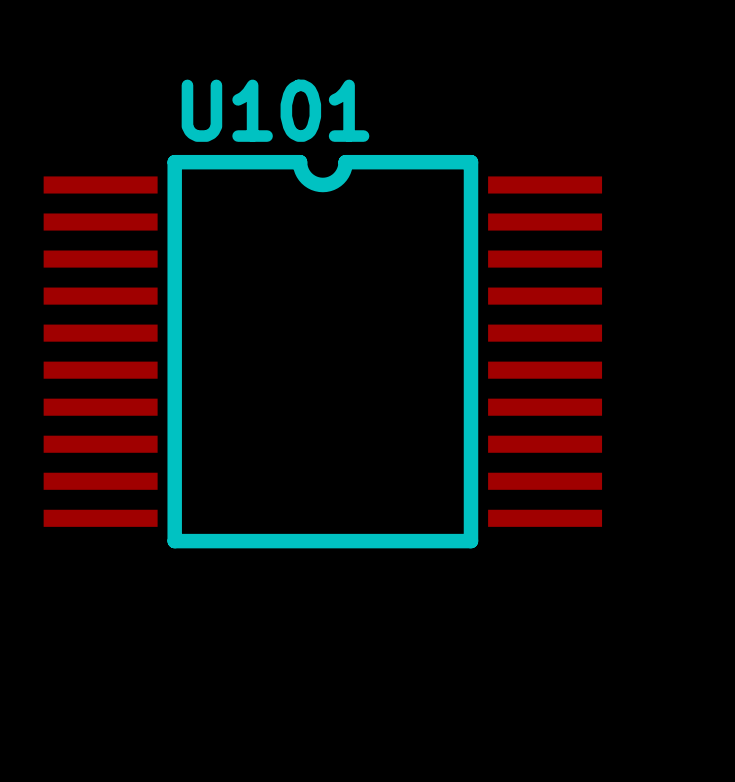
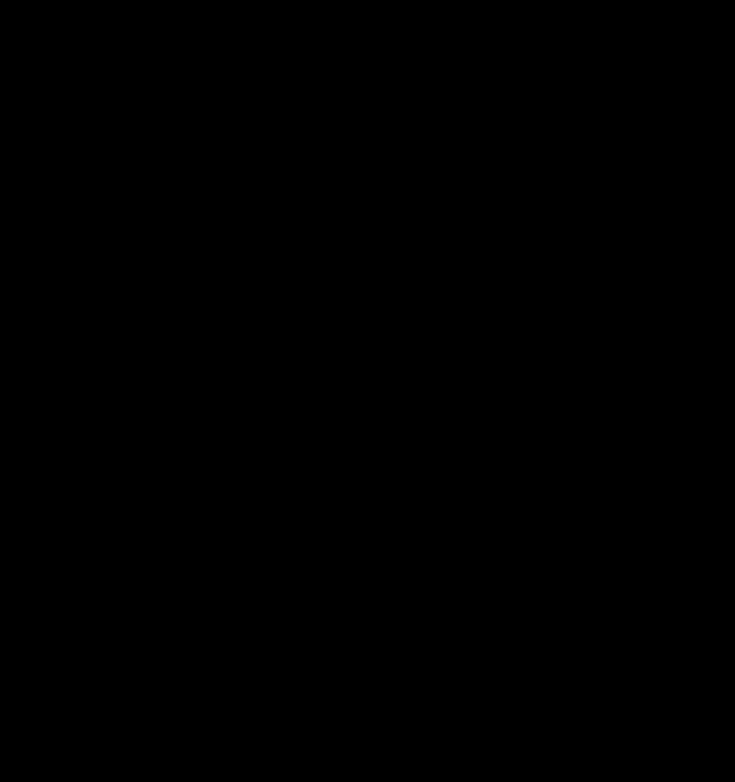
U101: (322, 351) -> none

